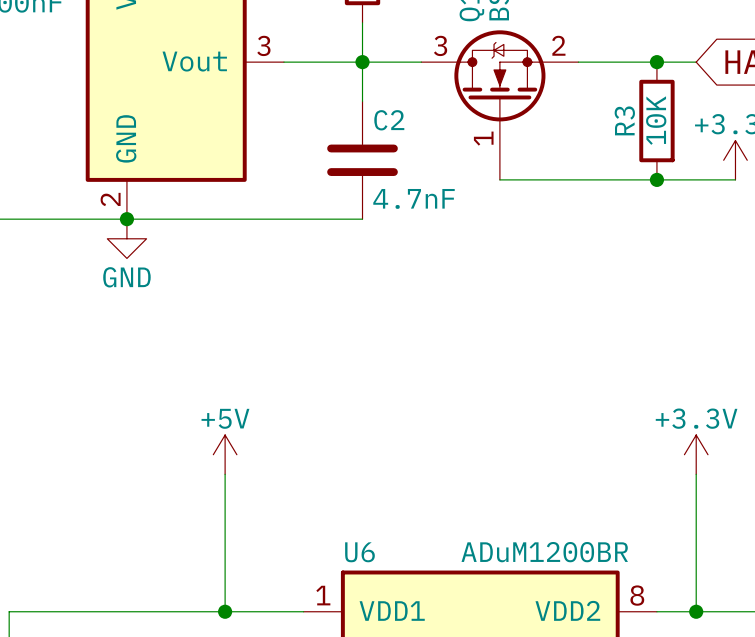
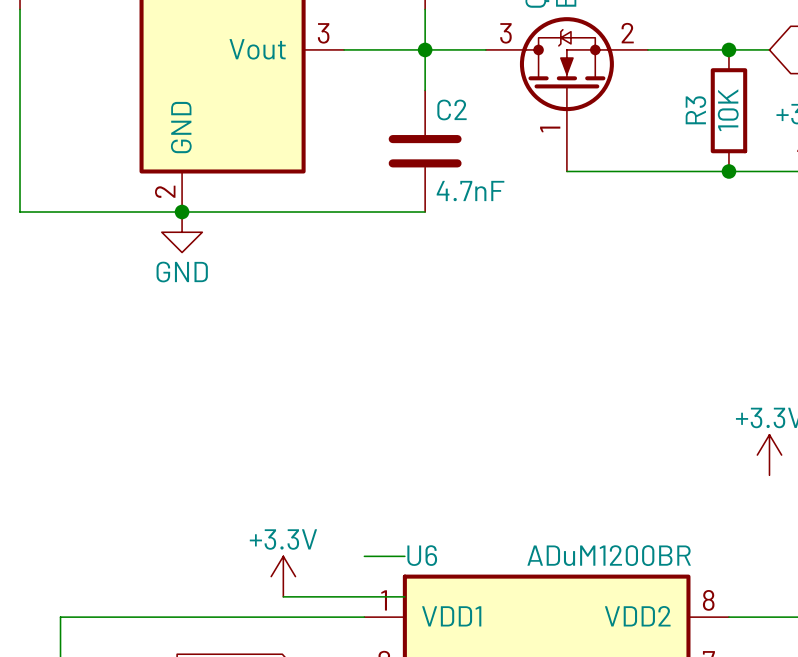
power symbol: +5V (225, 454) -> none
wire: (225, 474) (225, 611) -> none
wire: (696, 474) (696, 611) -> none
wire: none -> (364, 556) (404, 556)
power symbol: none -> +3.3V (283, 576)
wire: none -> (283, 596) (404, 596)
junction: (225, 611) -> none
junction: (696, 611) -> none

